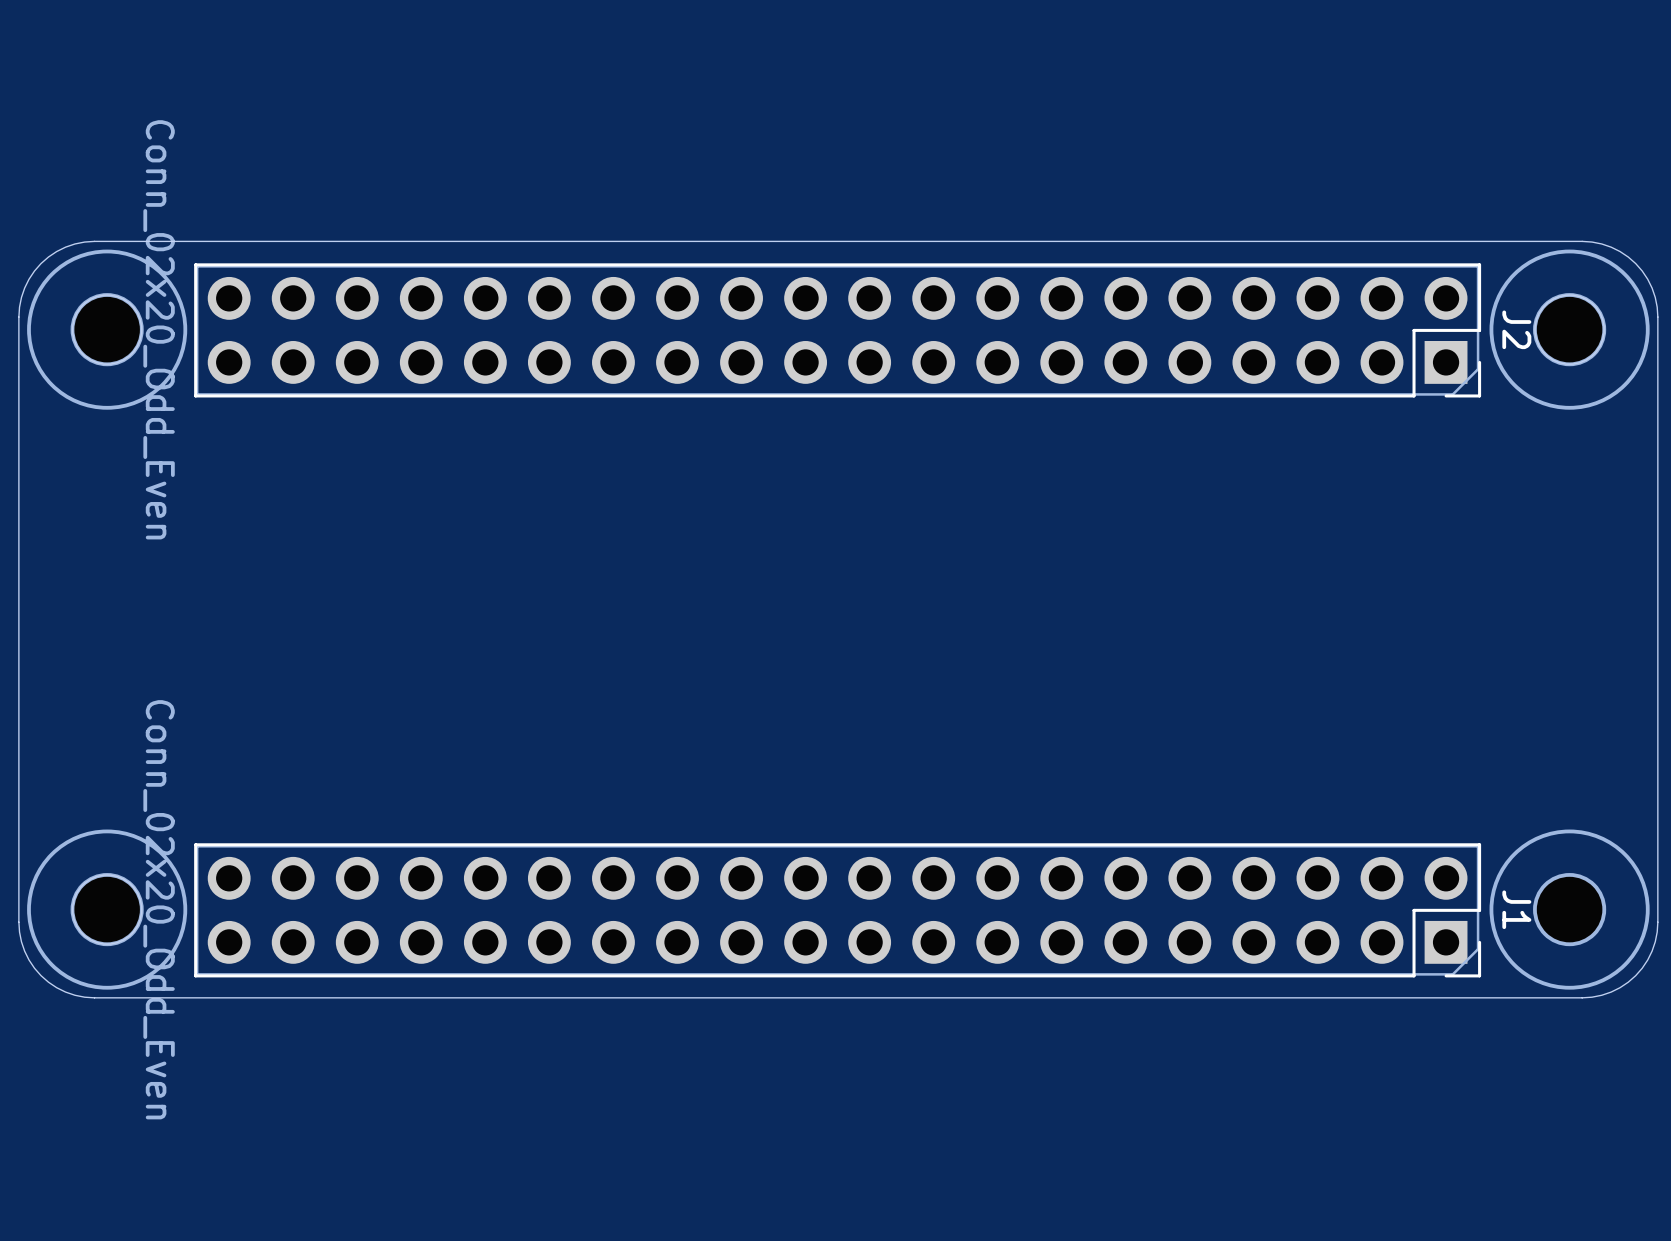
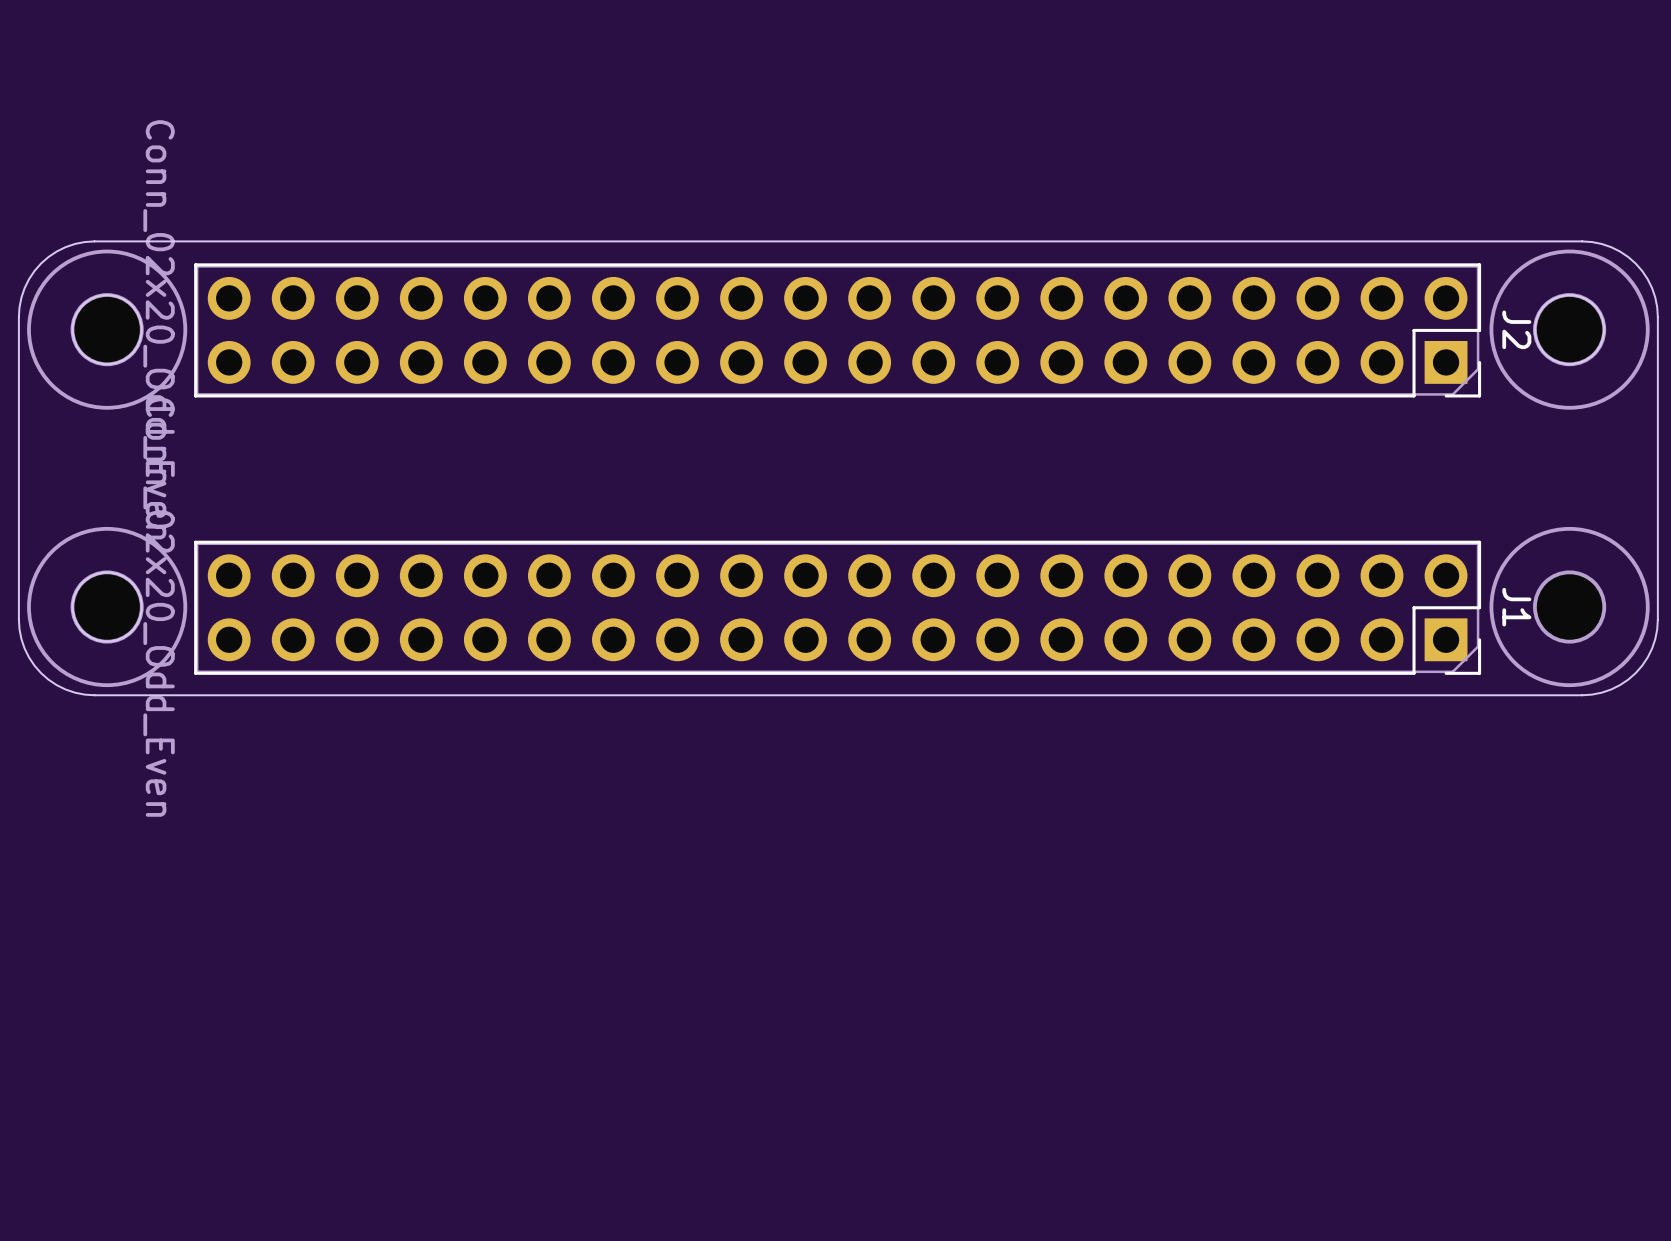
board edge: (1657, 619) (1657, 922) (1655, 941) (1647, 960) (1628, 982) (1611, 992) (1582, 997) (94, 997) (74, 995) (56, 987) (41, 975) (24, 951) (19, 932) (18, 619) -> (1657, 619) (1652, 648) (1635, 673) (1611, 689) (1582, 695) (94, 695) (65, 689) (41, 673) (24, 648) (18, 619)
part position: (107, 909) -> (107, 607)
part position: (1569, 909) -> (1569, 607)
J1 position: (837, 910) -> (837, 607)

